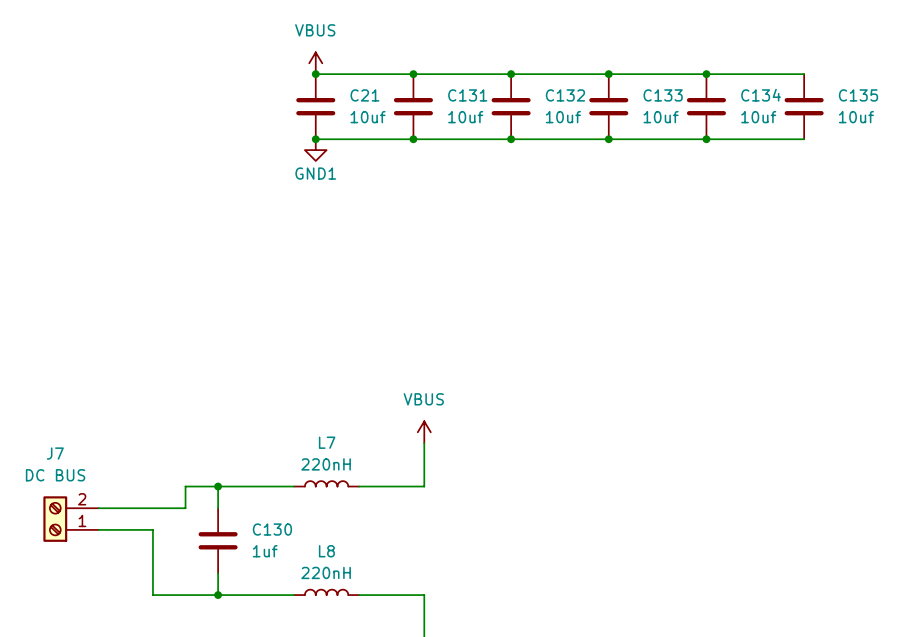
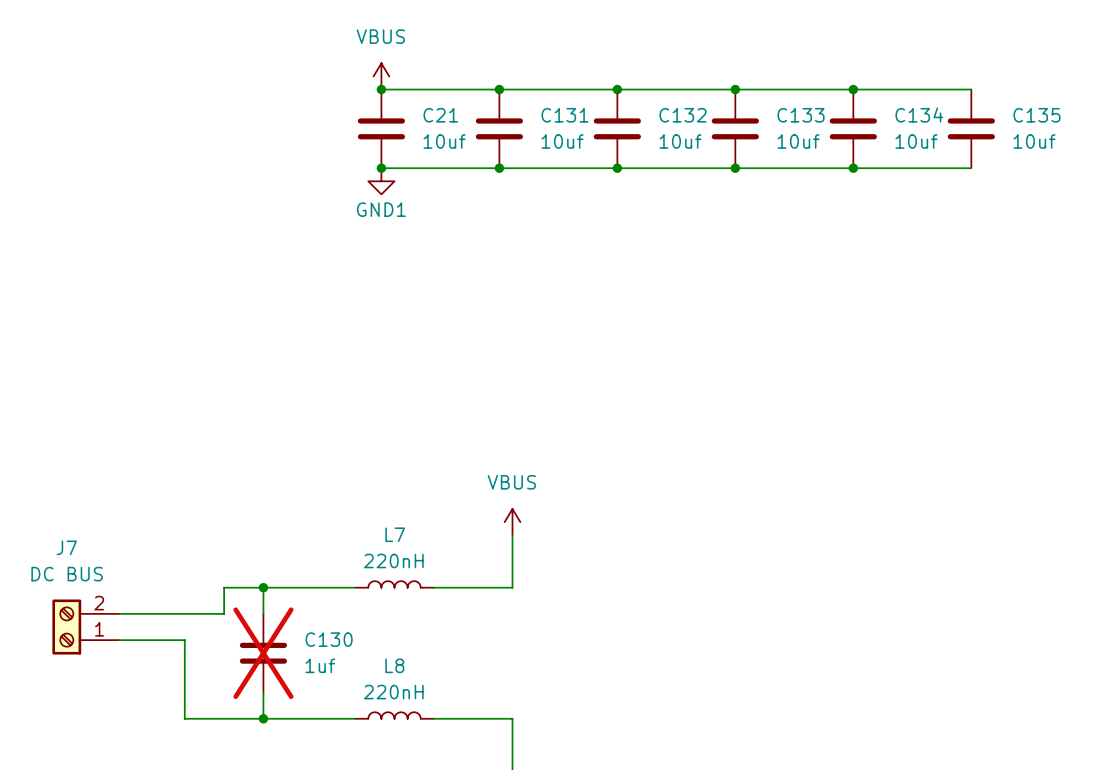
C130 do-not-place cross: none -> (263, 653)

